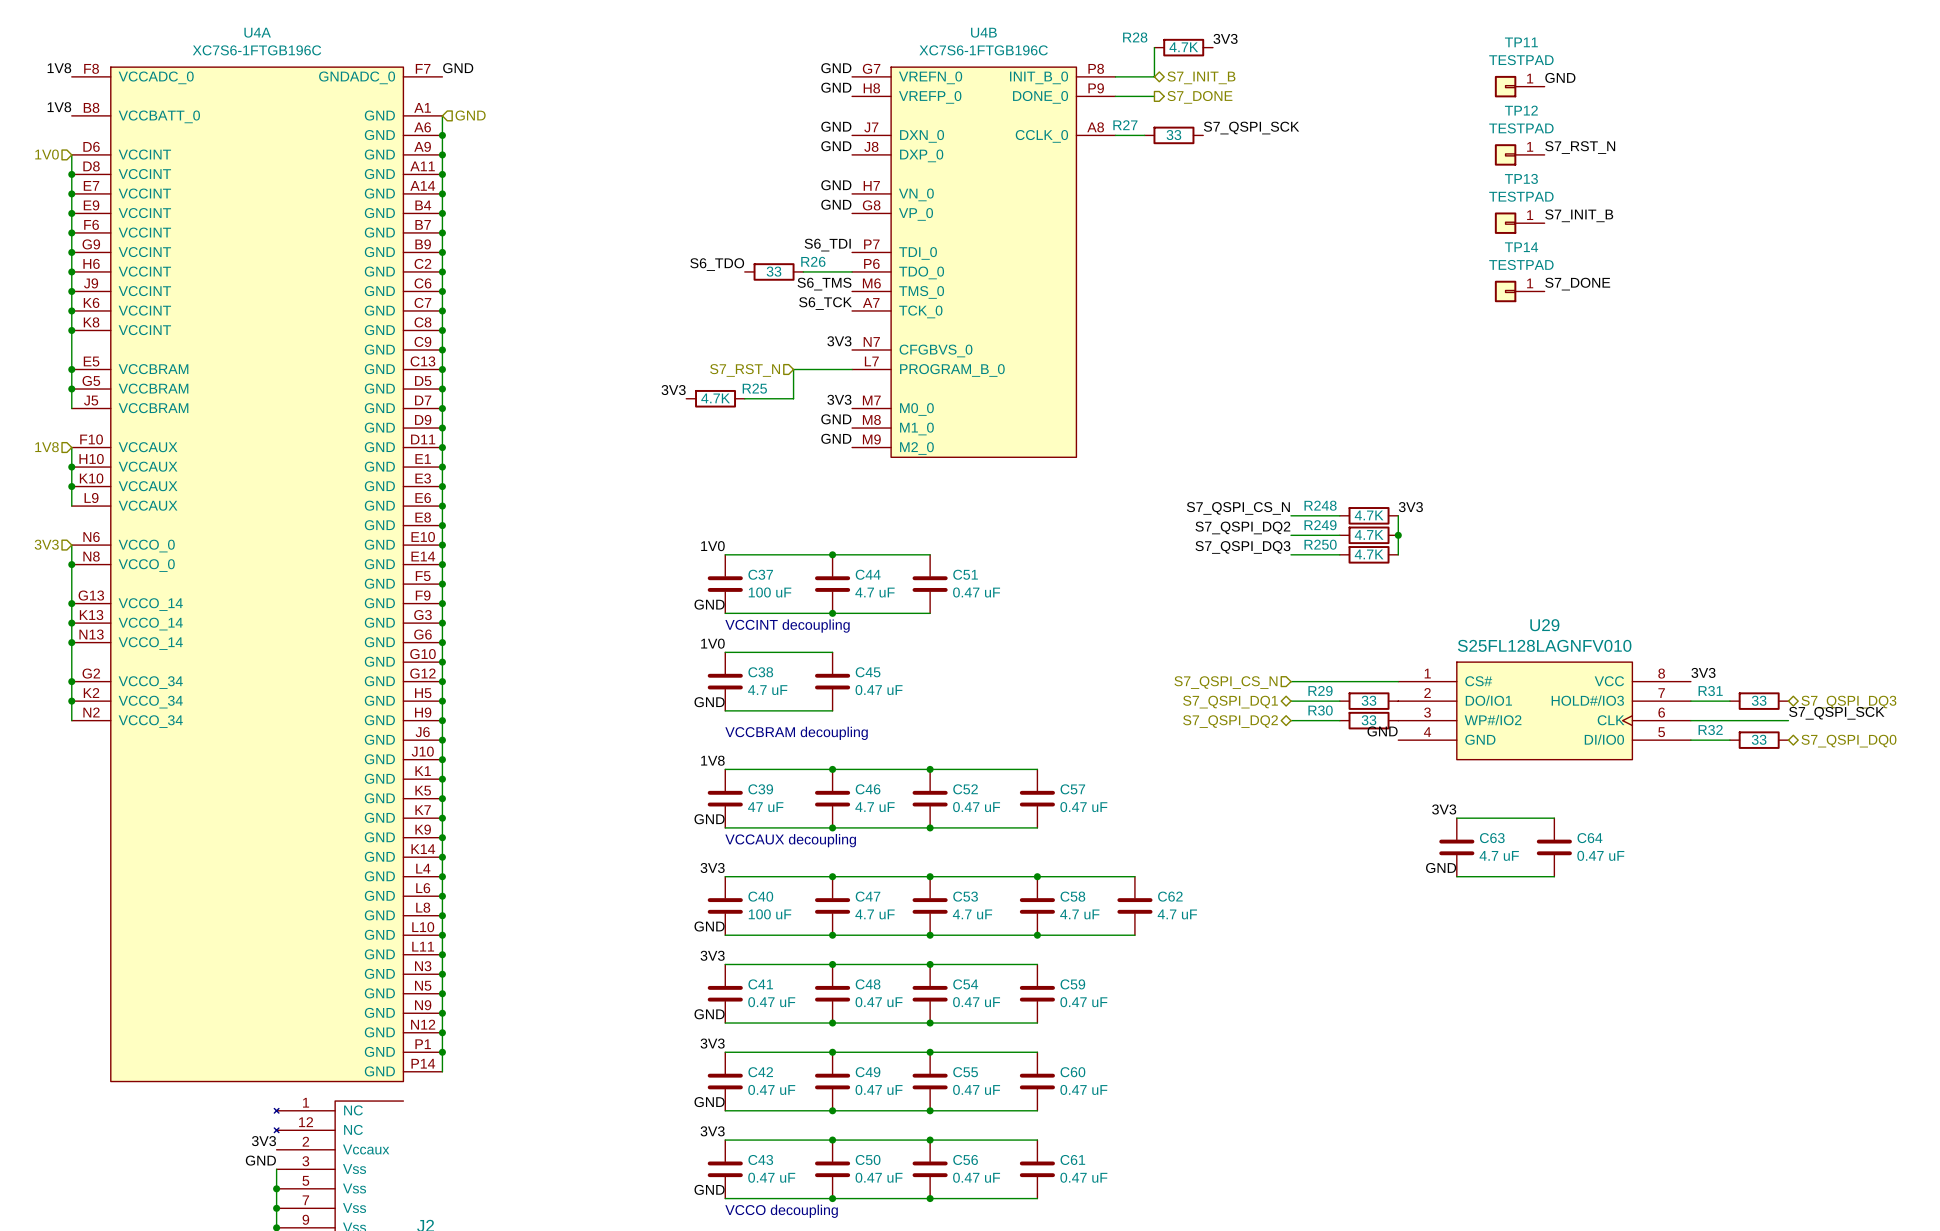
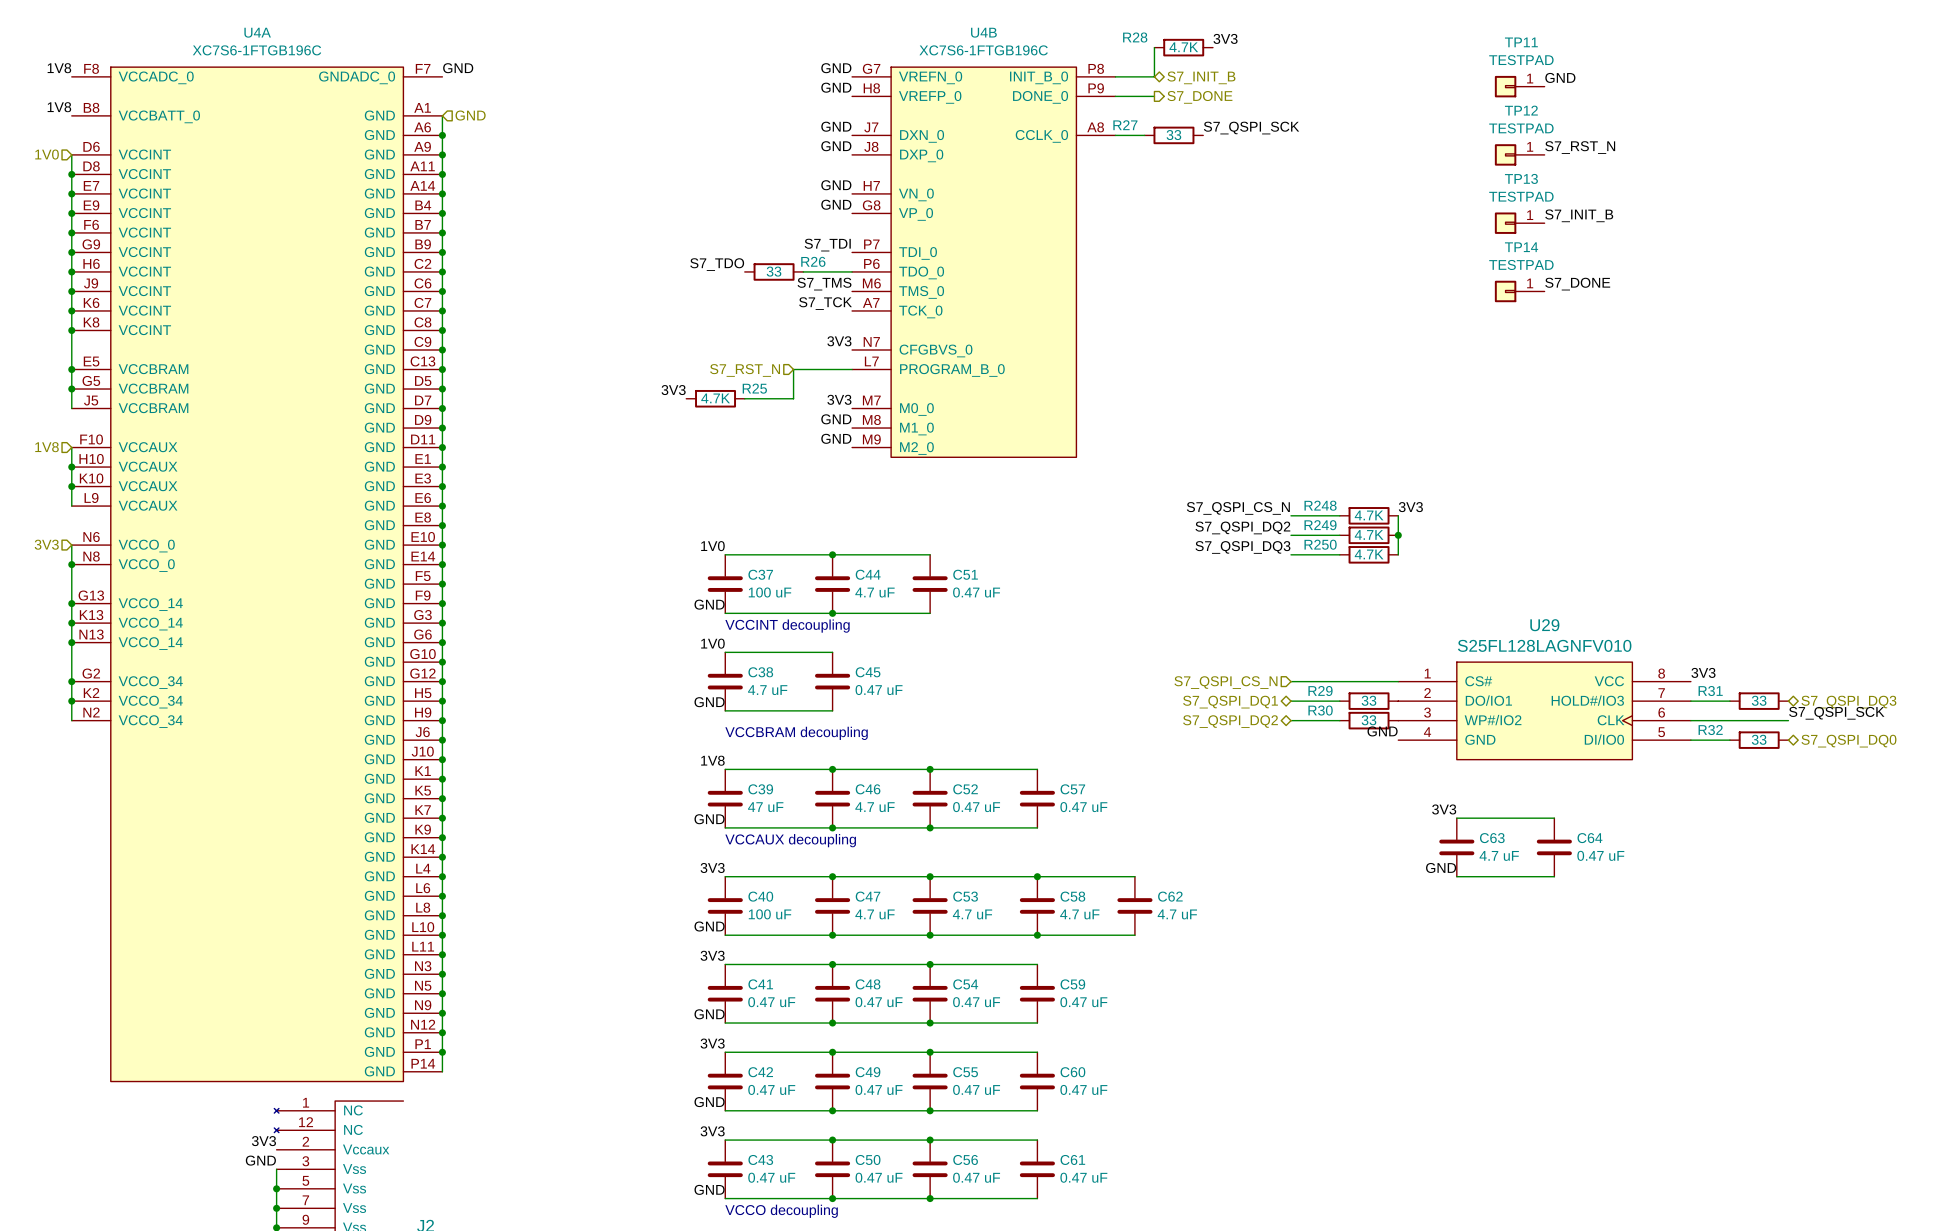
label: S6_TDI (827, 245) -> S7_TDI (827, 245)
label: S6_TDO (717, 264) -> S7_TDO (717, 264)
label: S6_TMS (824, 284) -> S7_TMS (824, 284)
label: S6_TCK (825, 303) -> S7_TCK (825, 303)

